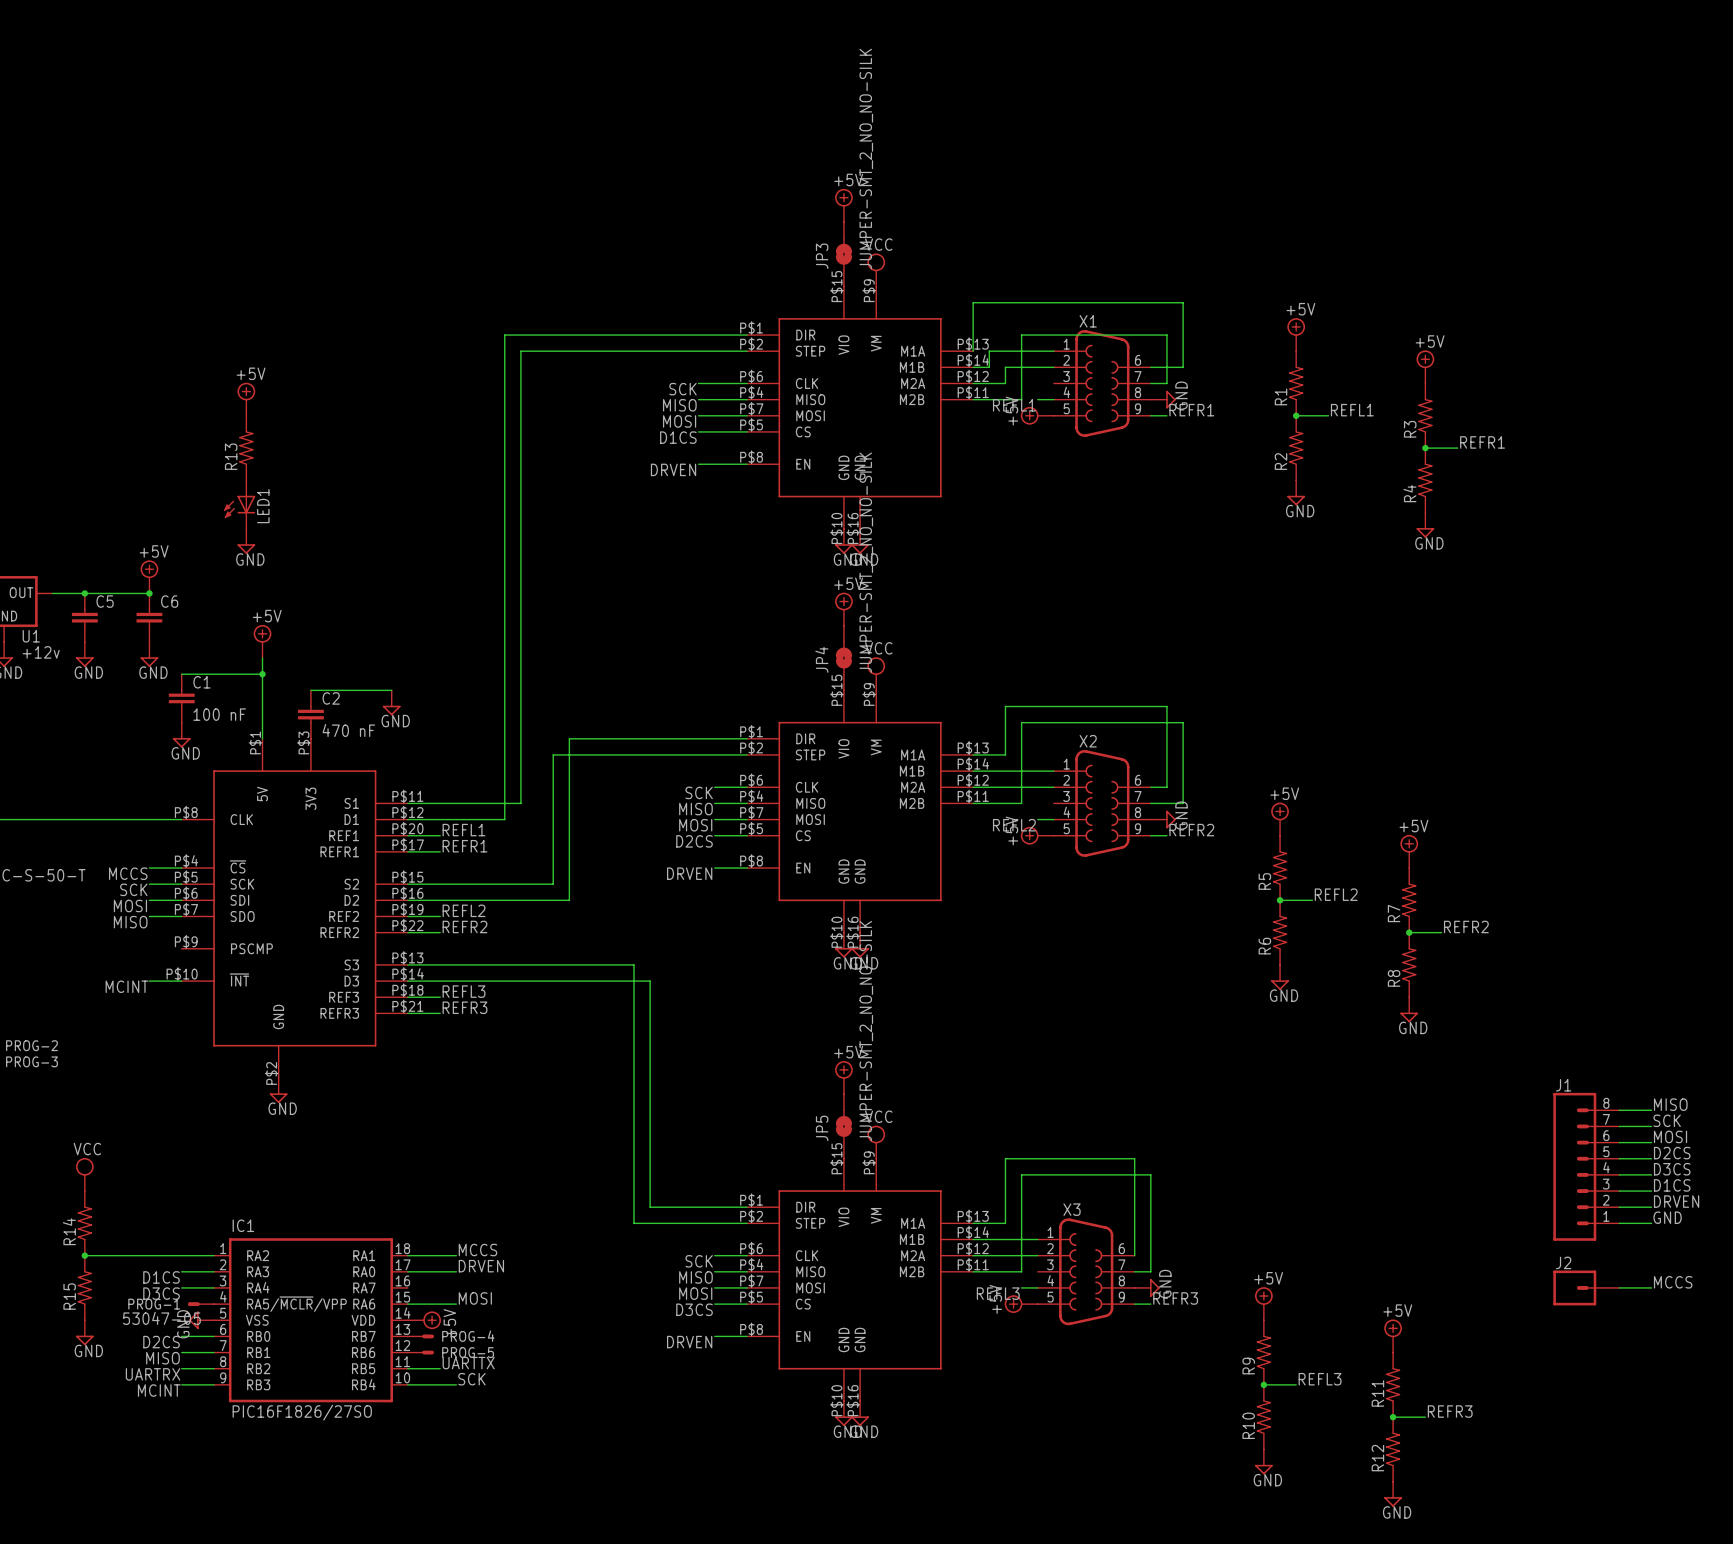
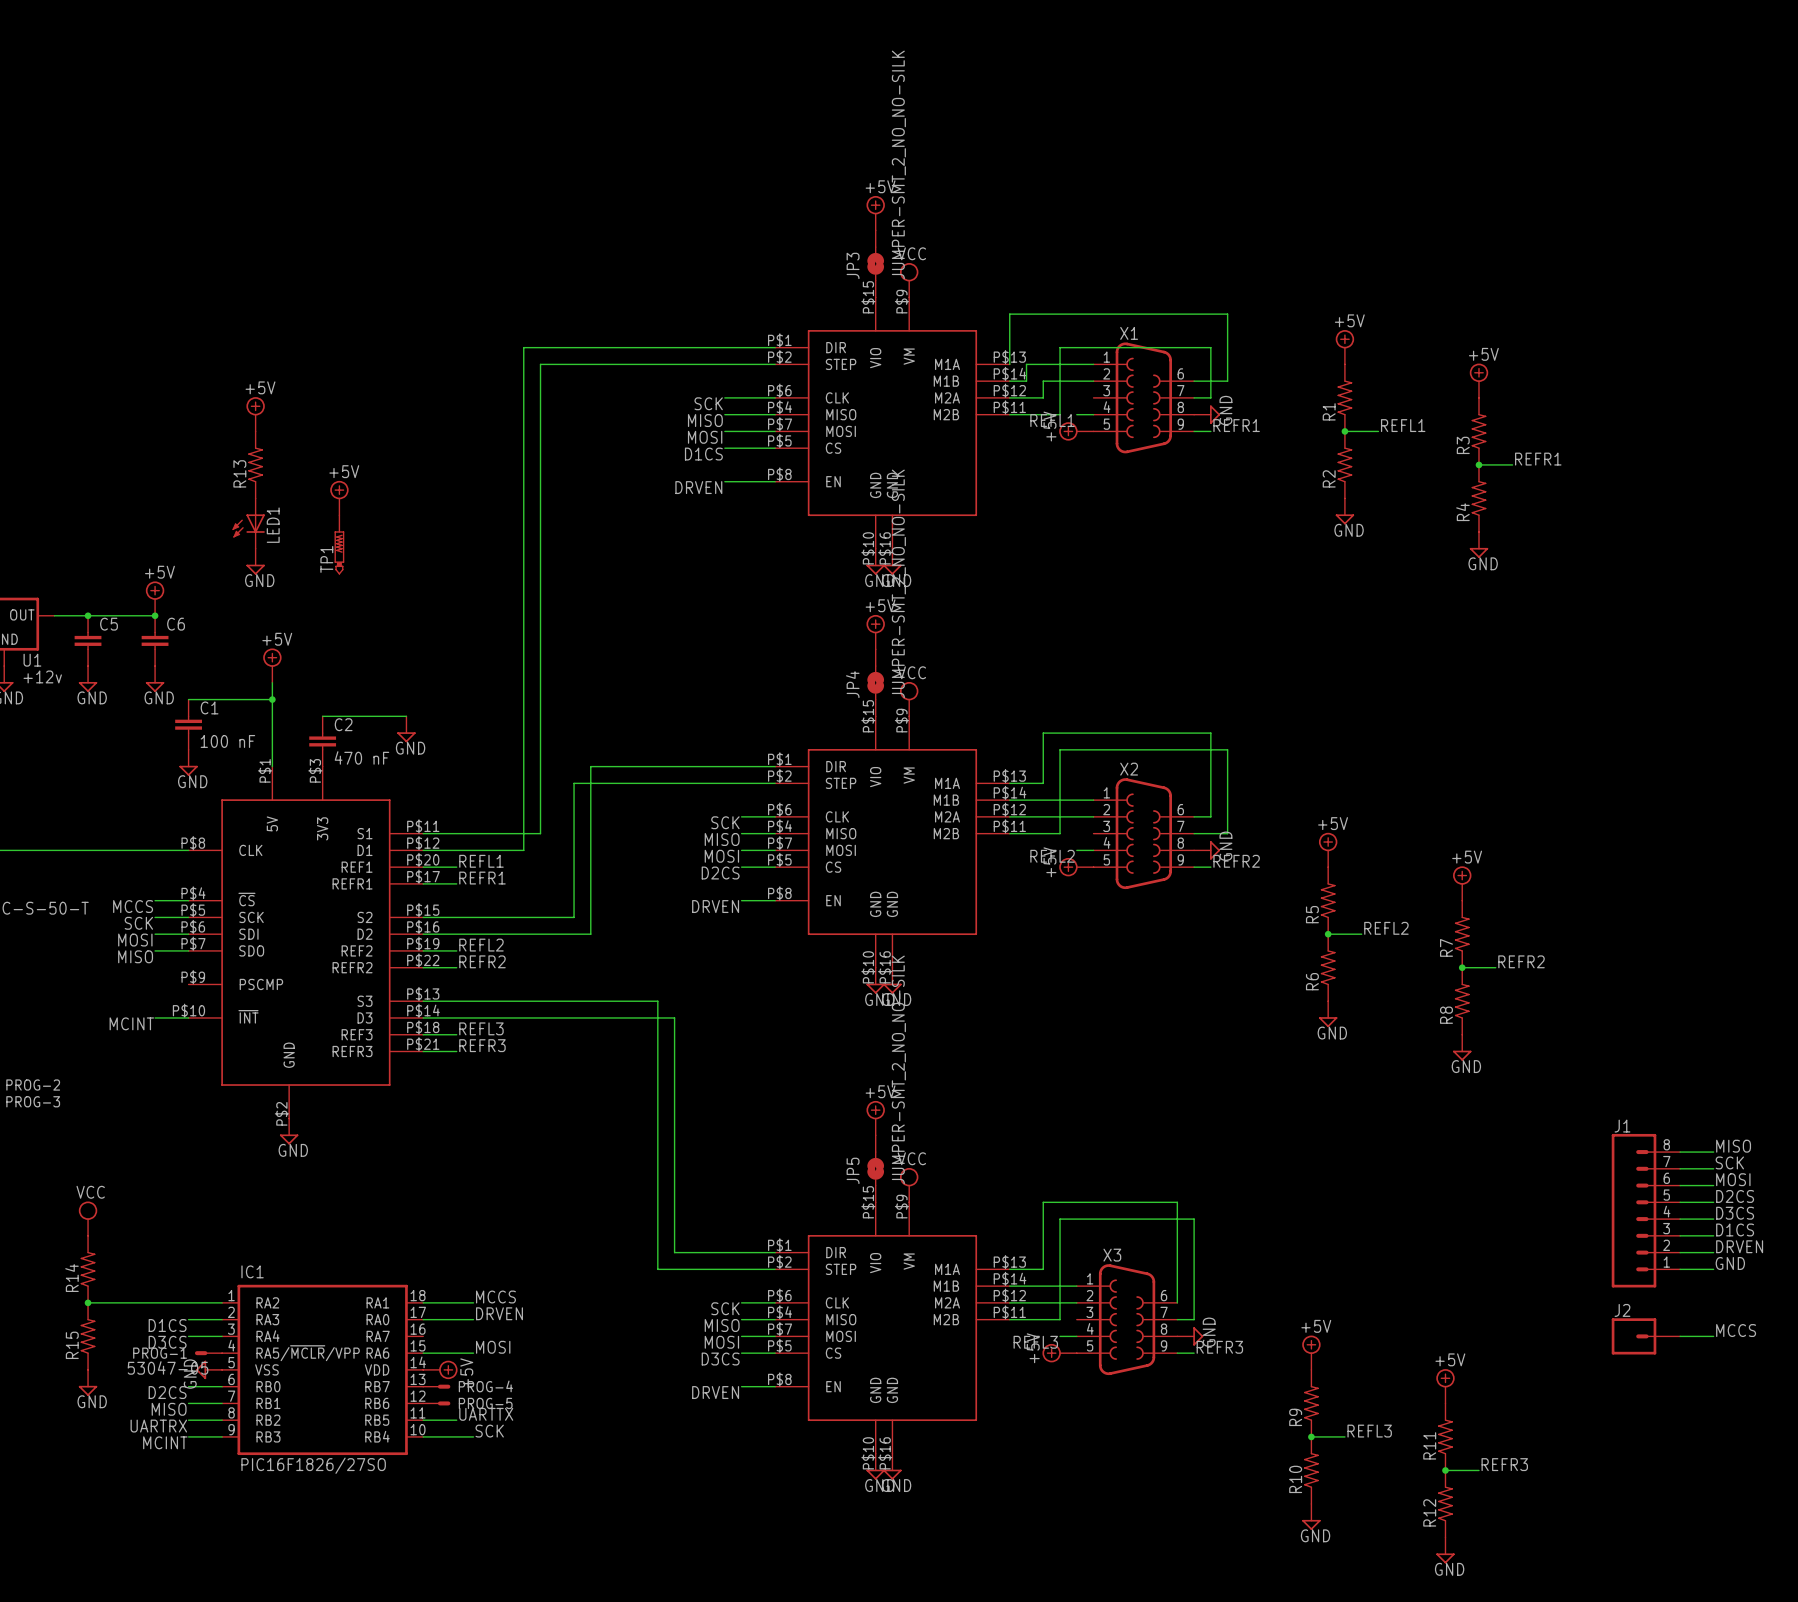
power symbol: none -> +5V (339, 498)
TP1: none -> (339, 544)

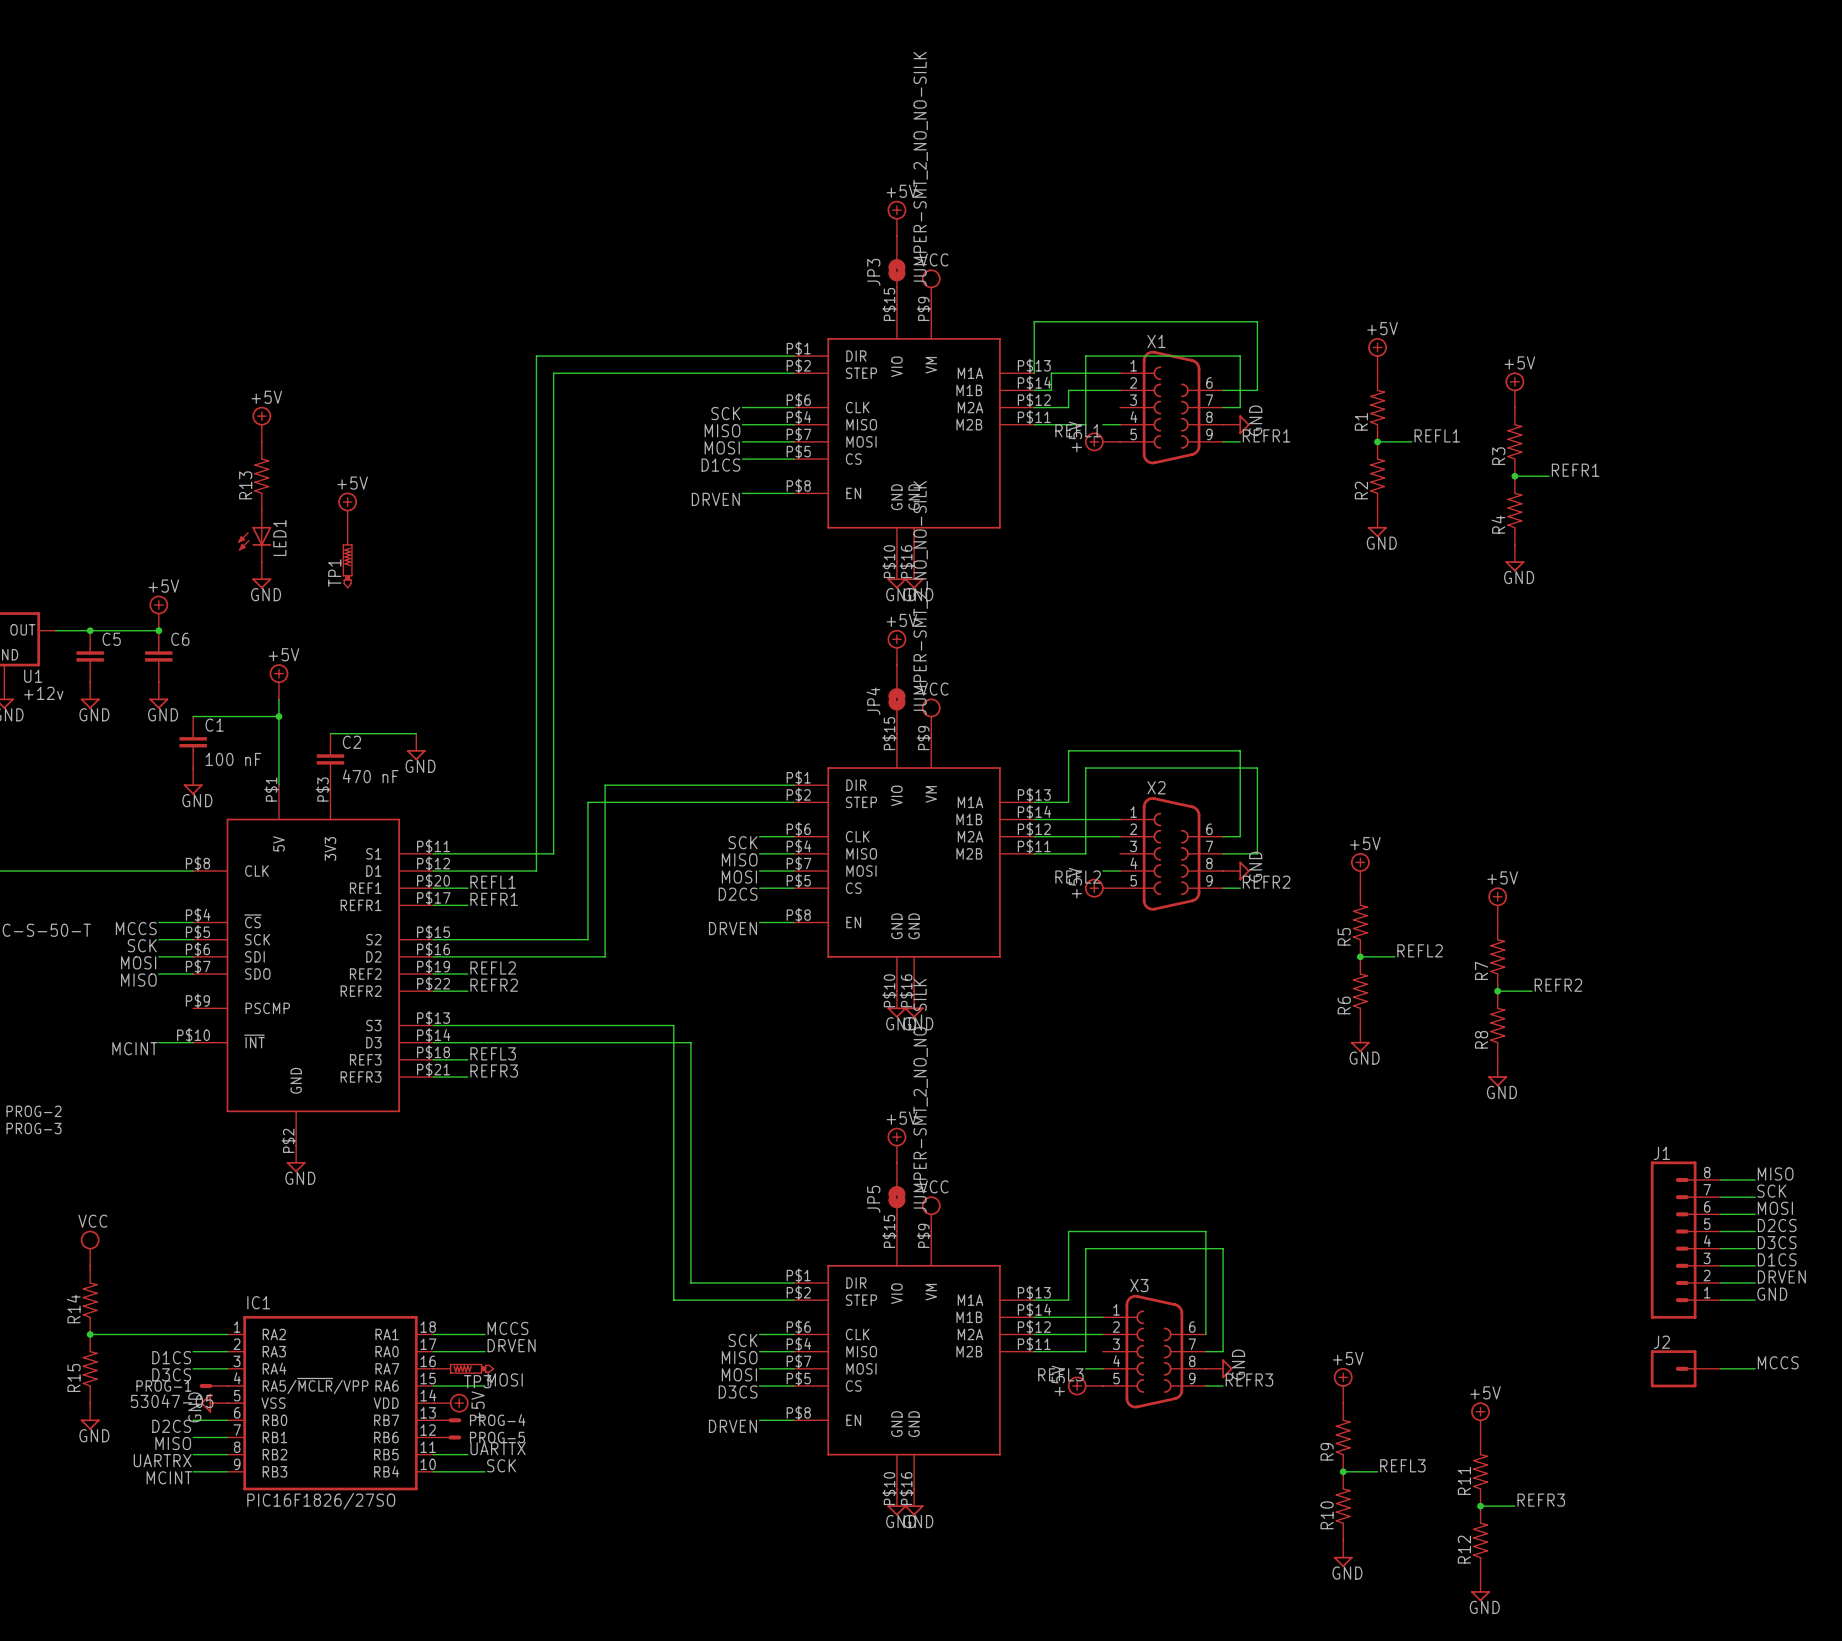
TP3: none -> (463, 1368)

